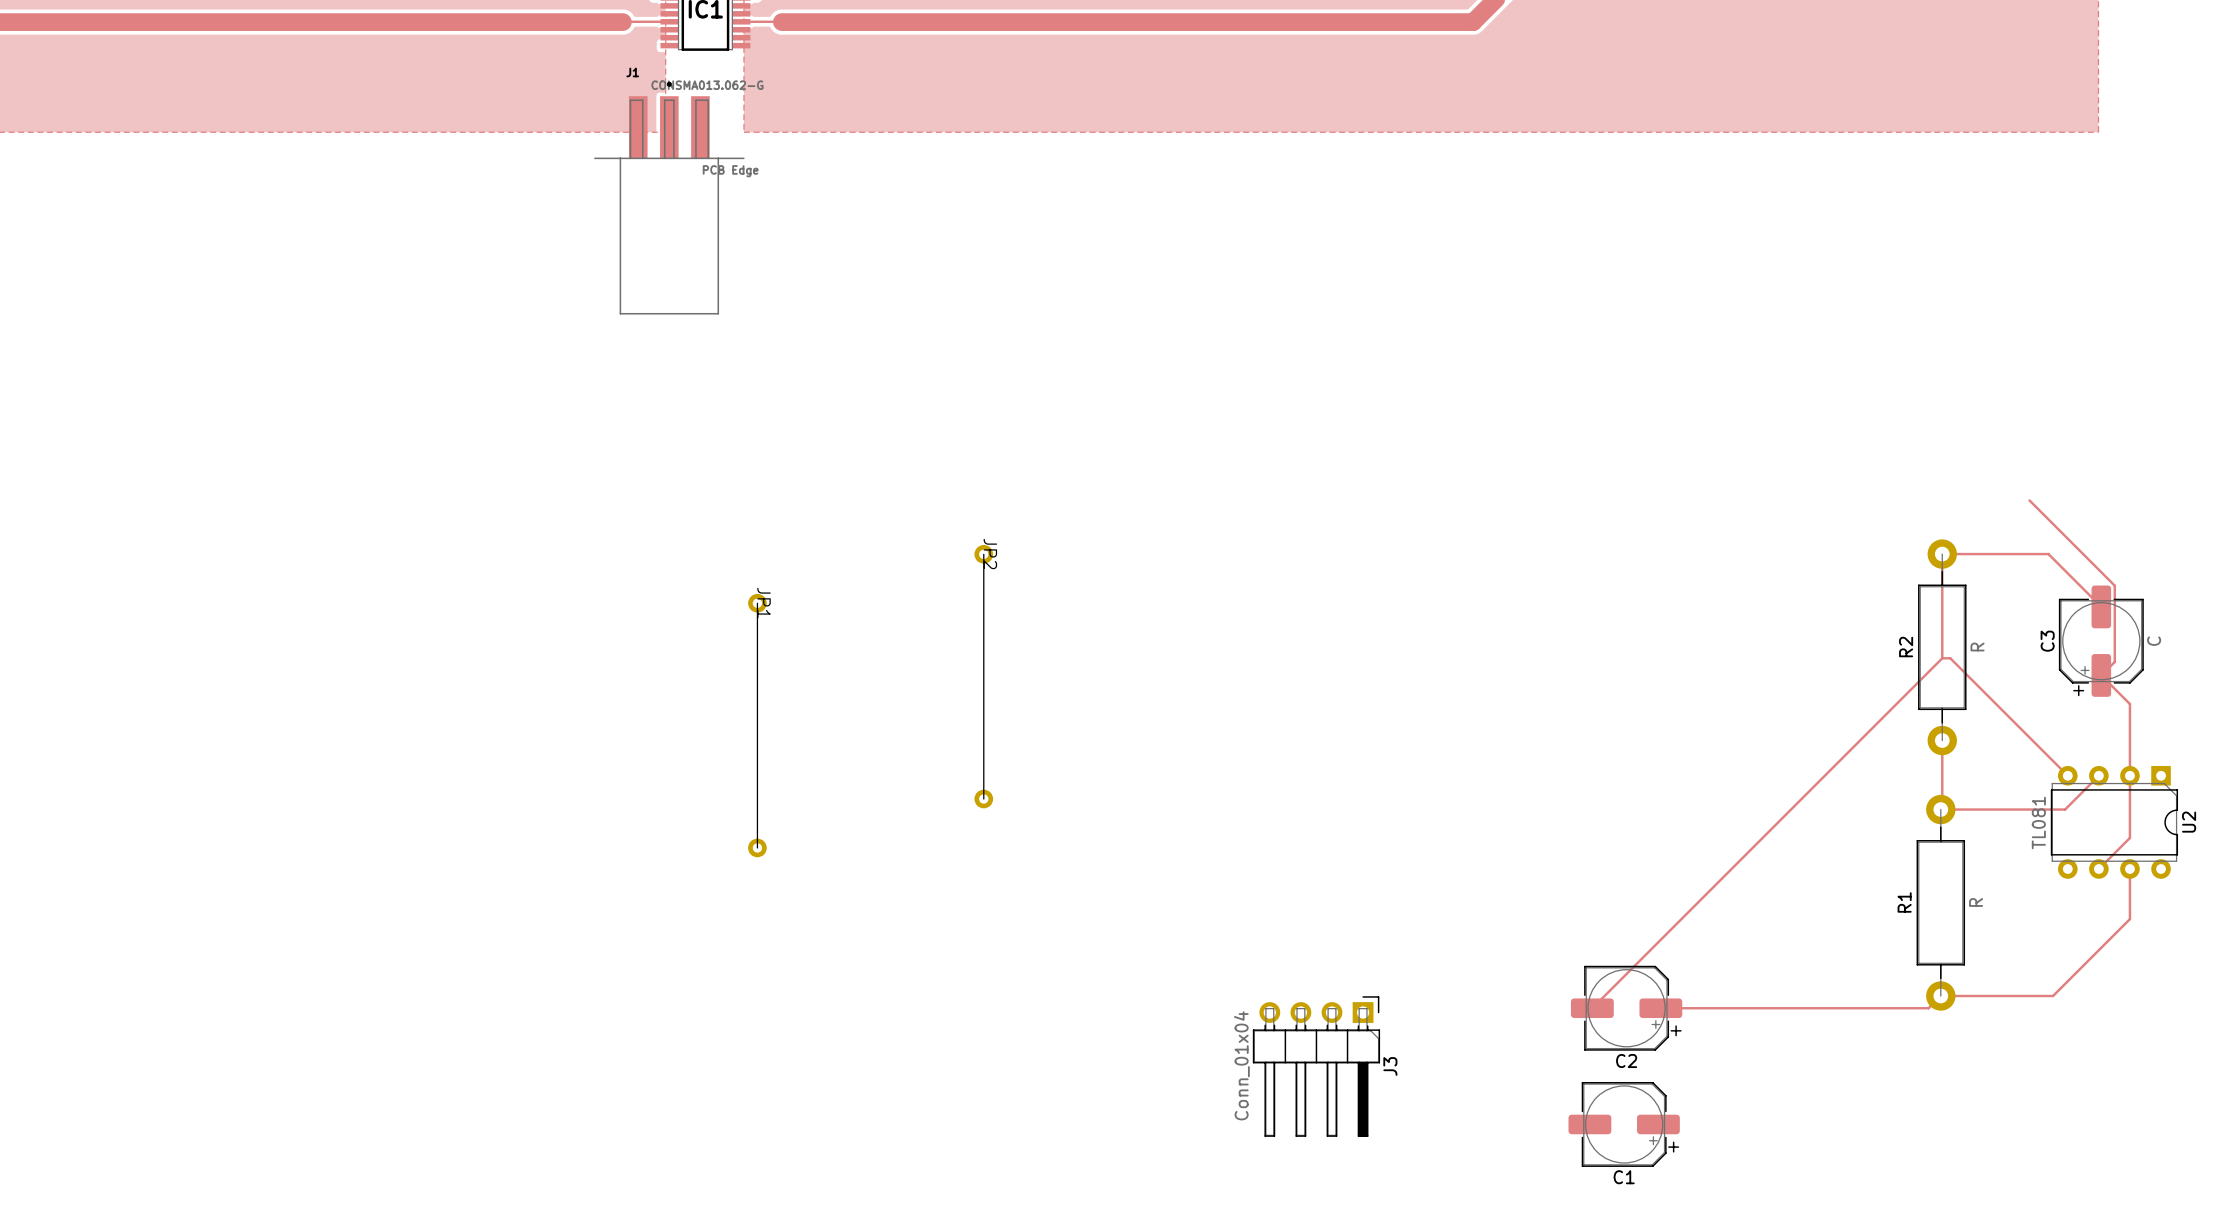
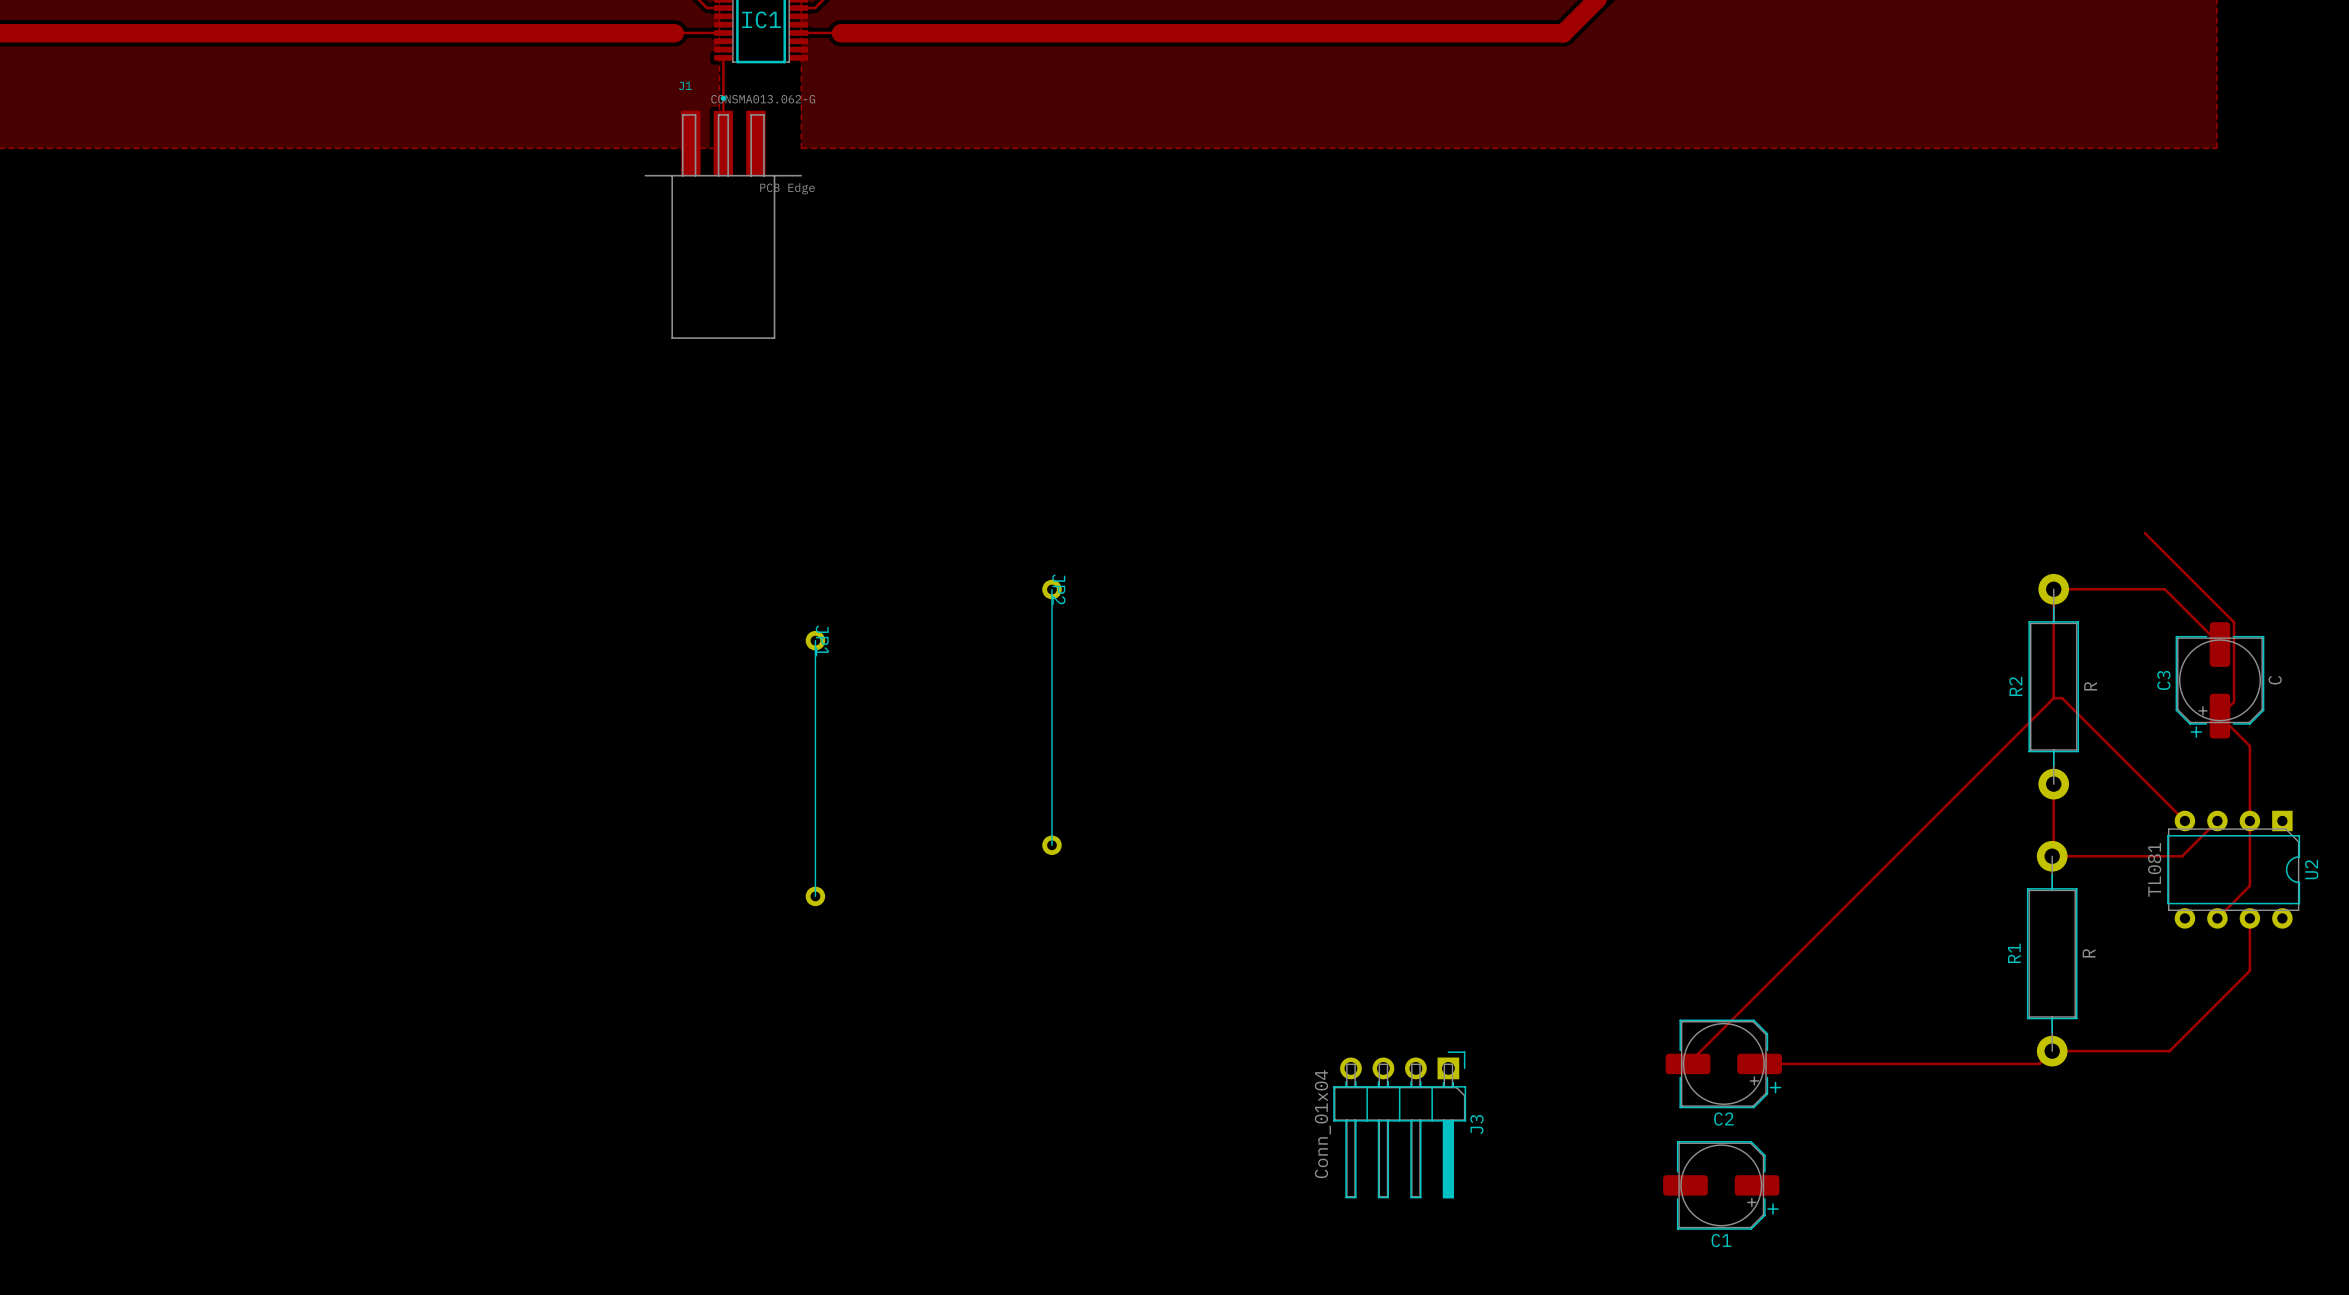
track: none -> (723, 58) (723, 143)

